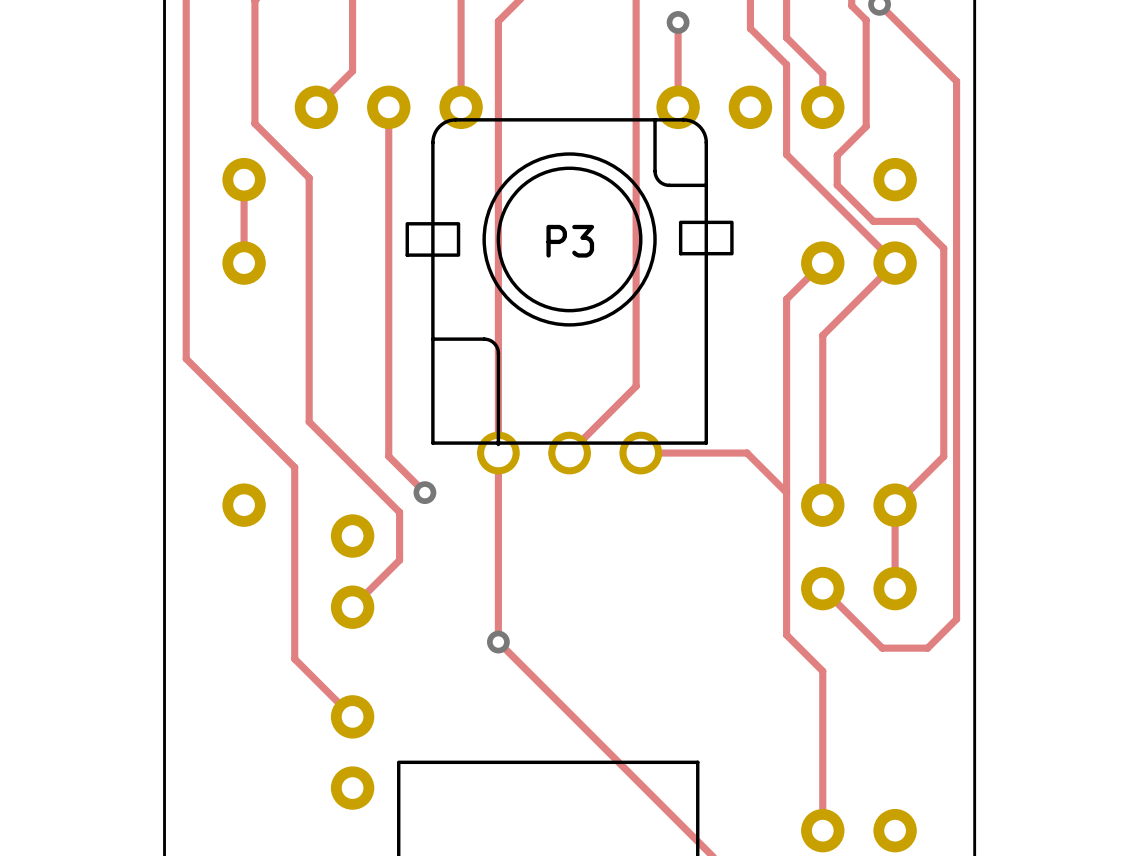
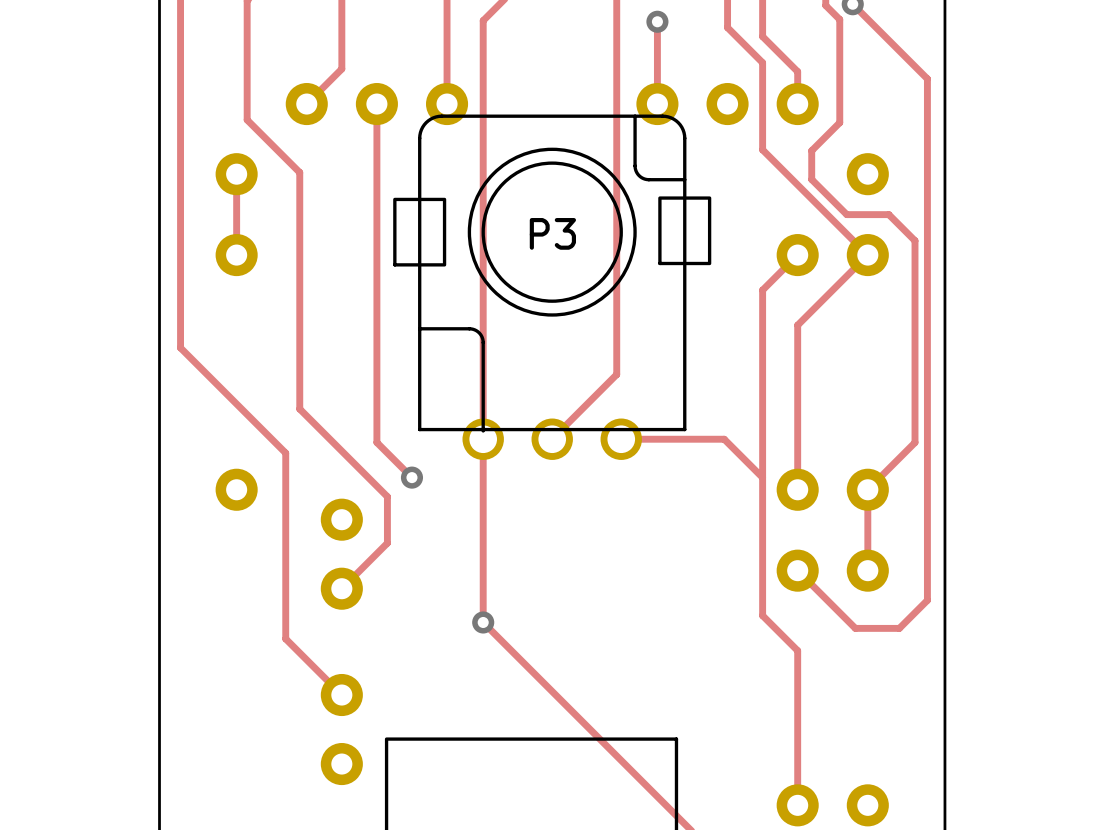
P3 footprint: [405, 118, 734, 475] -> [393, 114, 712, 460]

